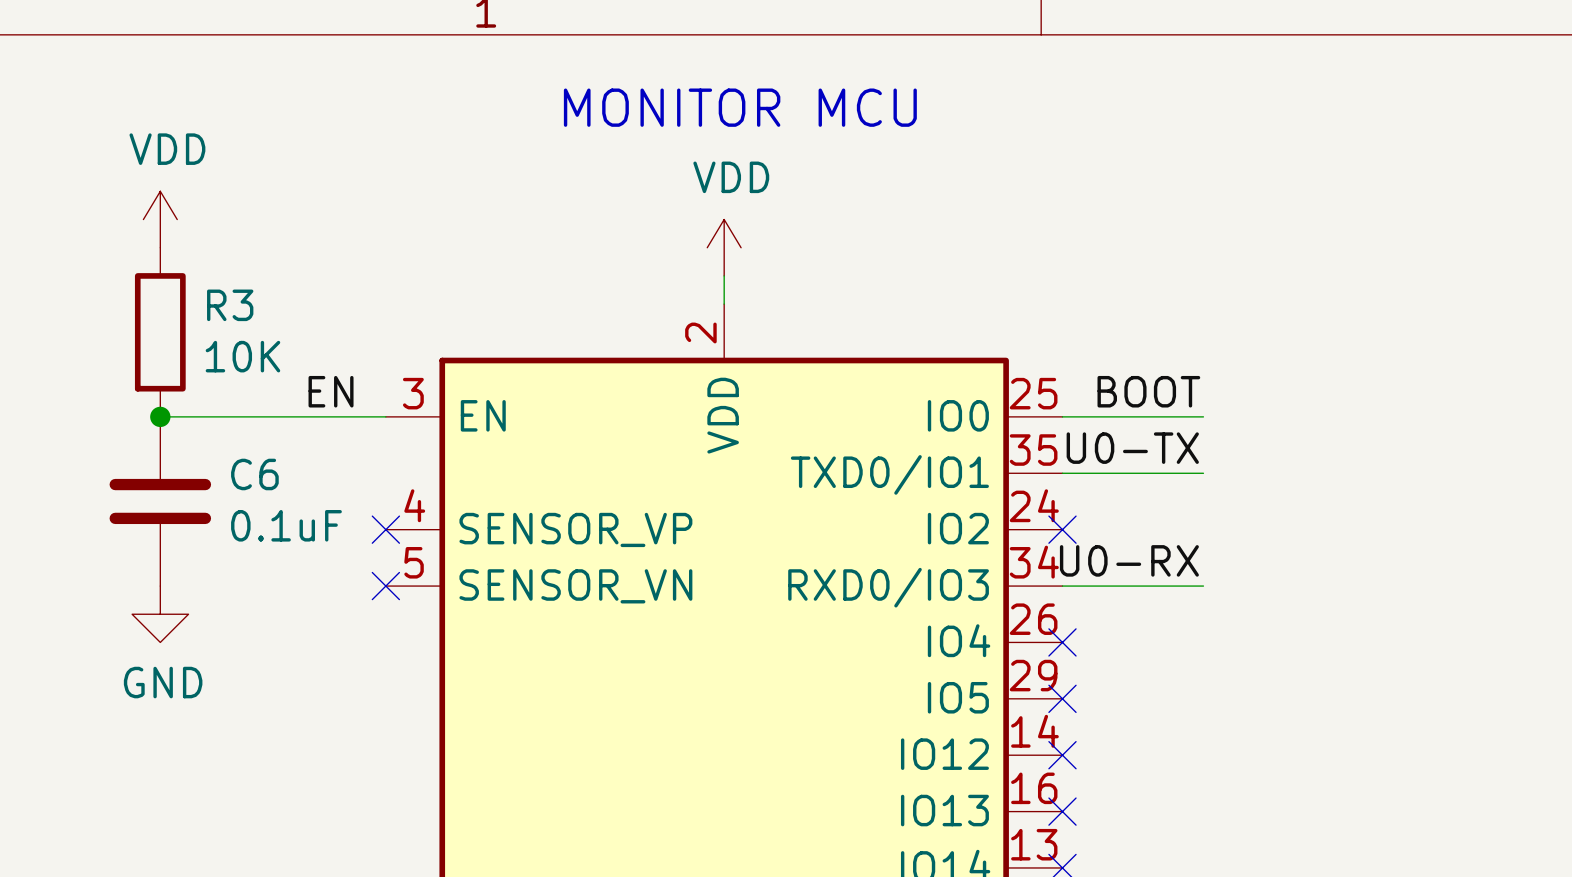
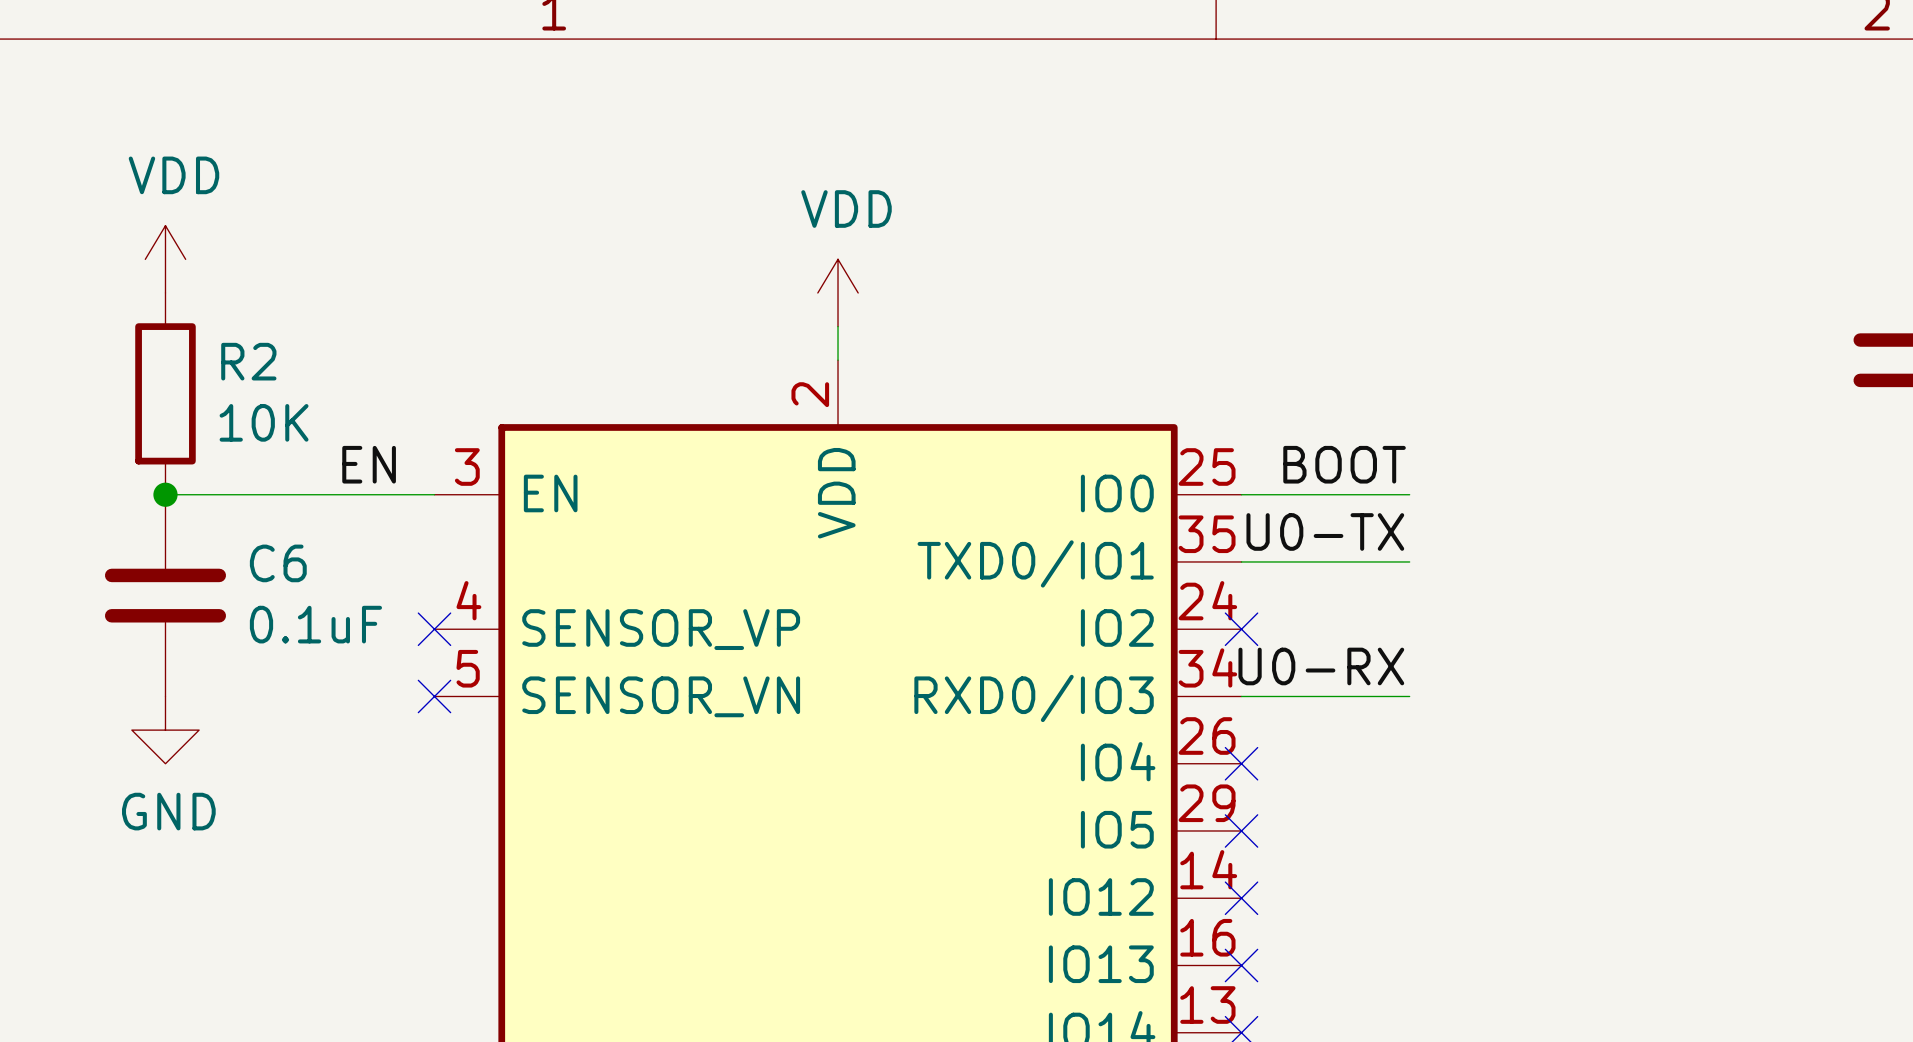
text: MONITOR MCU (740, 107) -> none
R3 name: R3 (230, 305) -> R2 (248, 361)

